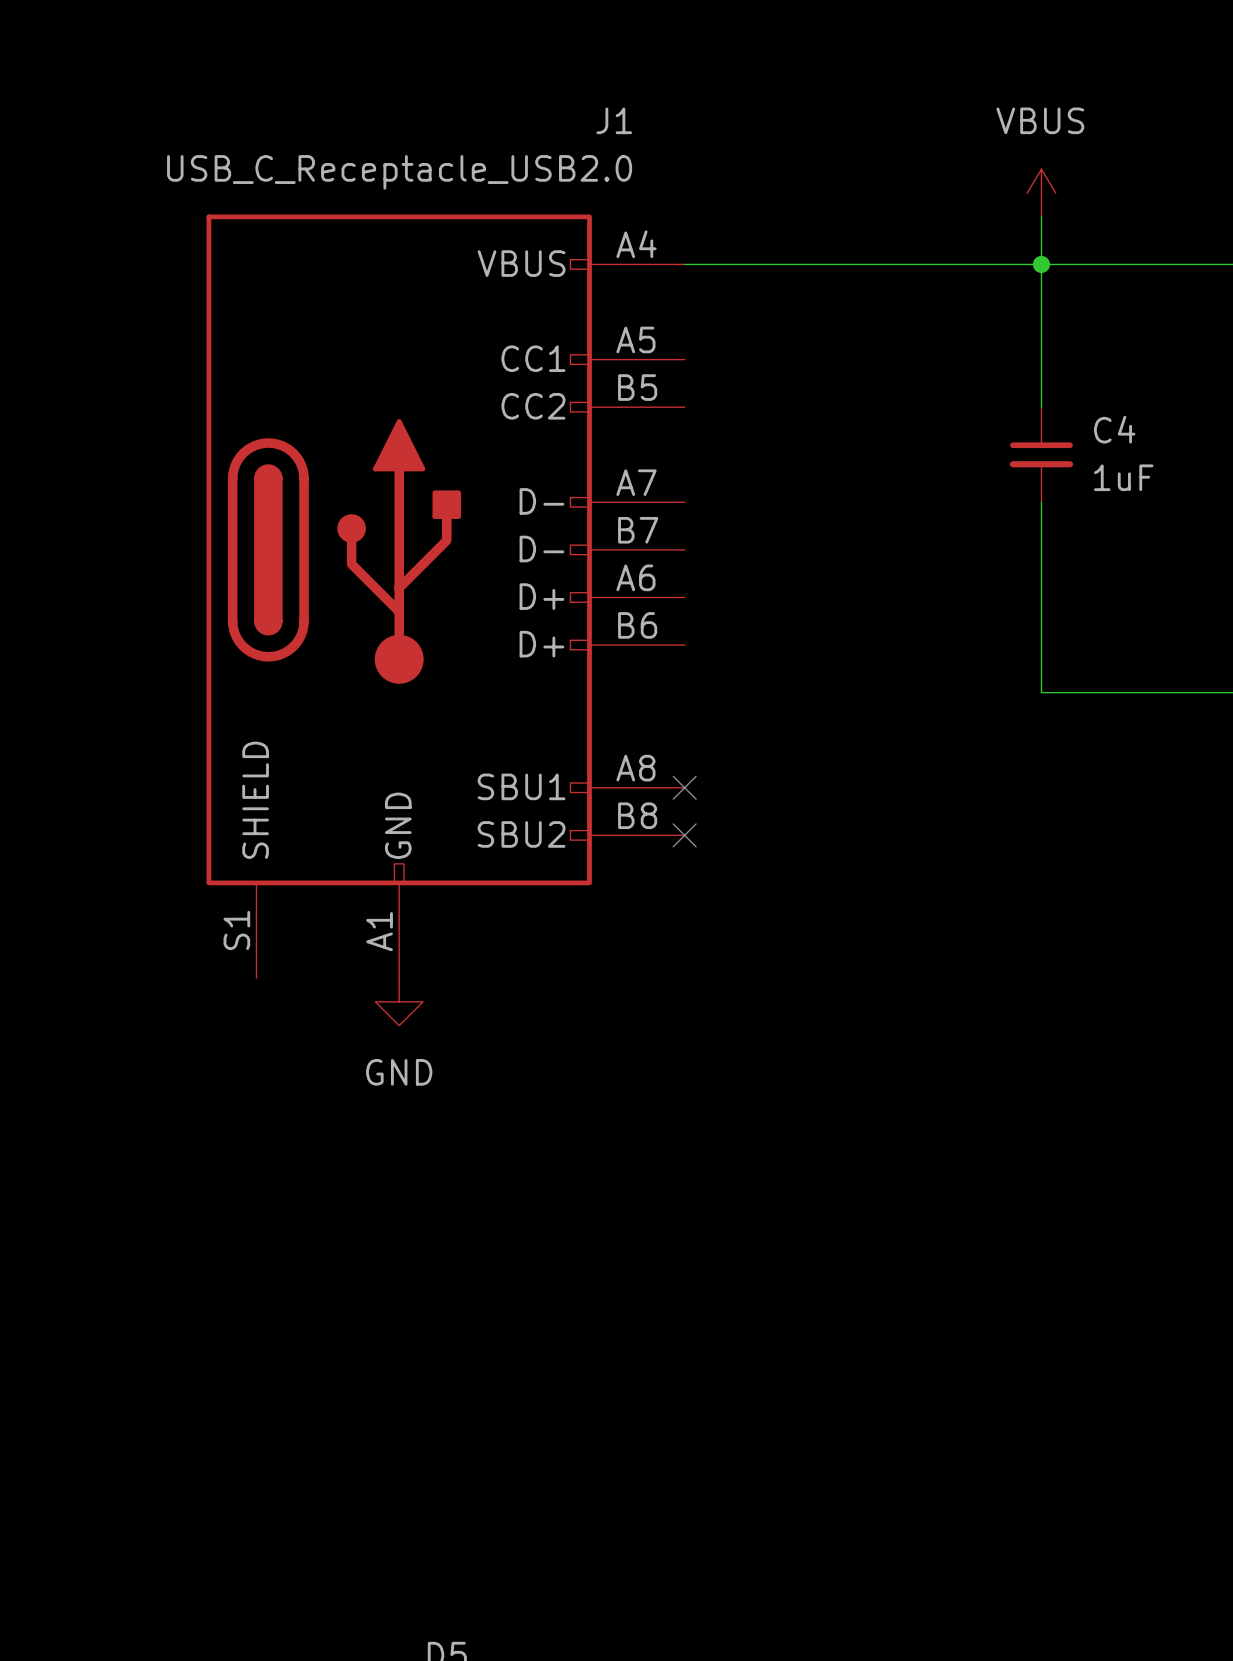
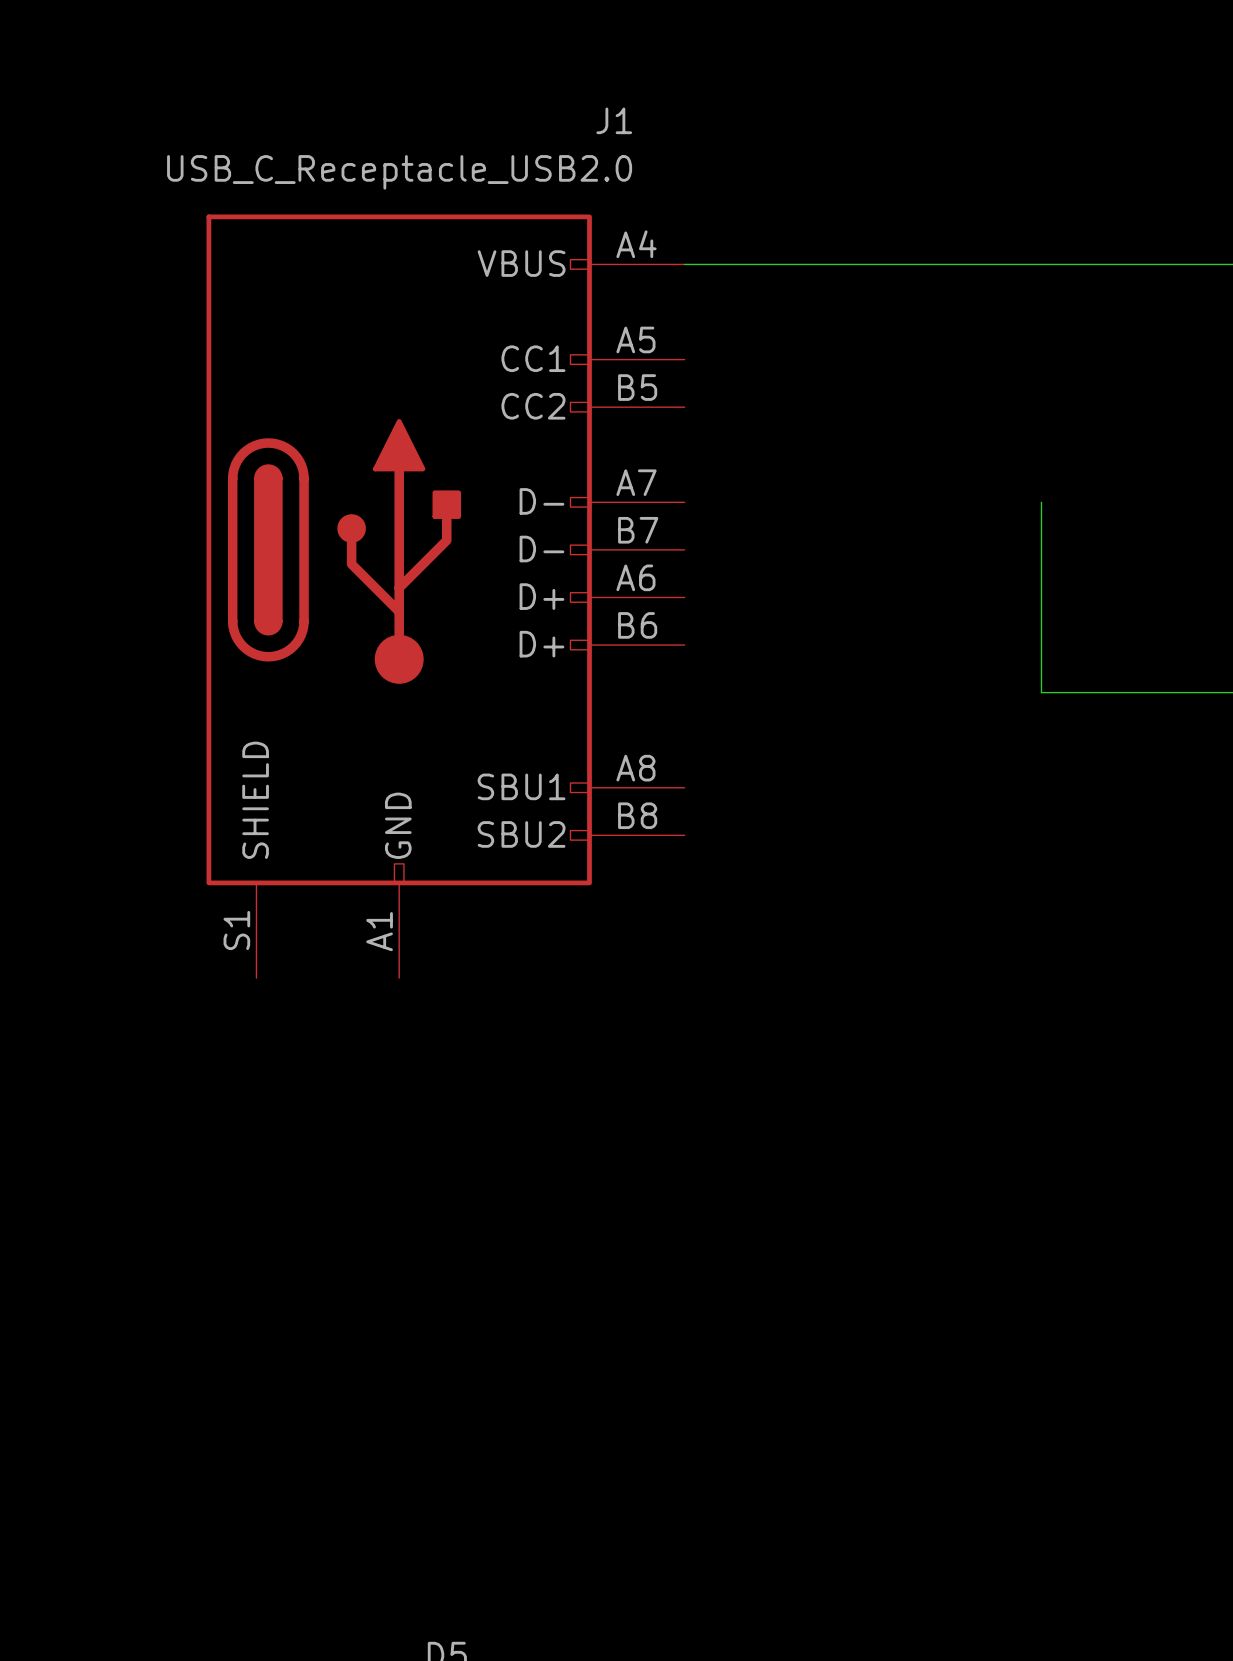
power symbol: VBUS (1041, 193) -> none
wire: (1041, 216) (1041, 407) -> none
junction: (1041, 264) -> none
C4: 1uF (1041, 454) -> none
no-connect mark: (684, 787) -> none
no-connect mark: (684, 835) -> none
power symbol: GND (399, 1001) -> none

